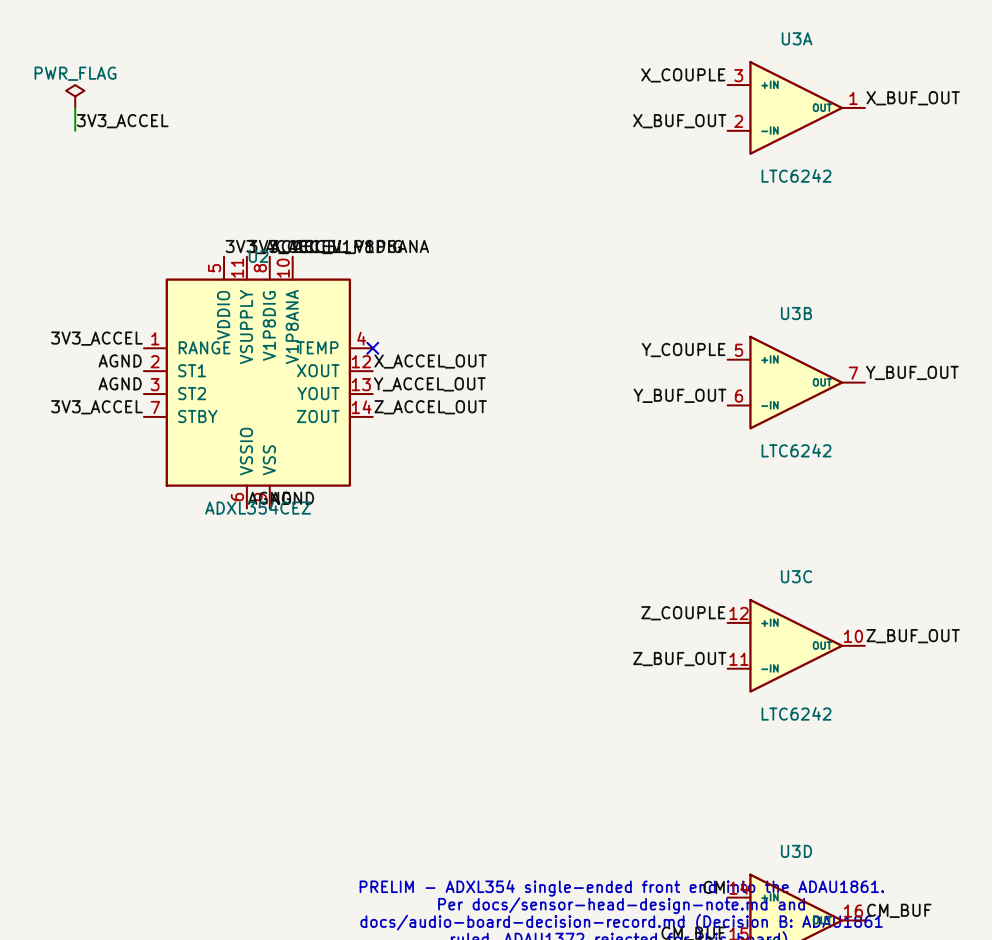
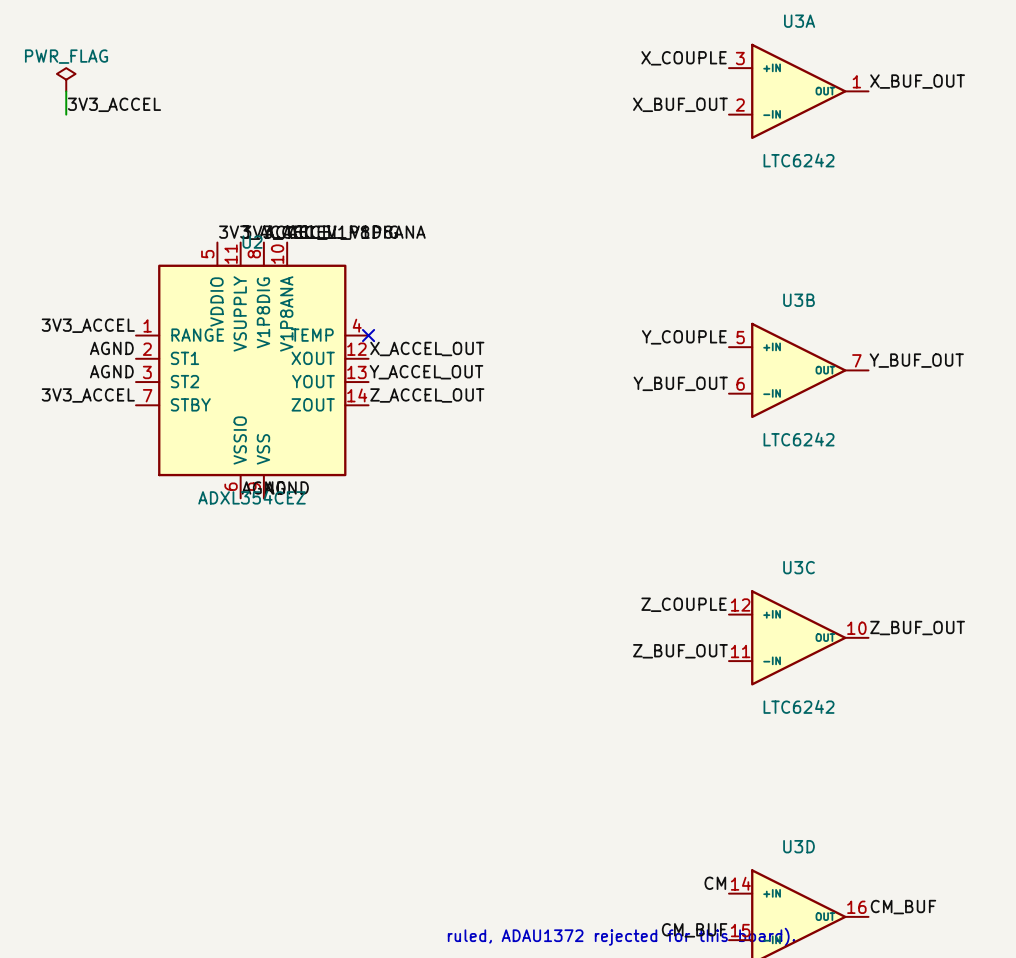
text: PRELIM - ADXL354 single-ended front end into the ADAU1861. (621, 888) -> none
text: Per docs/sensor-head-design-note.md and (621, 905) -> none
text: docs/audio-board-decision-record.md (Decision B: ADAU1861 (621, 922) -> none

